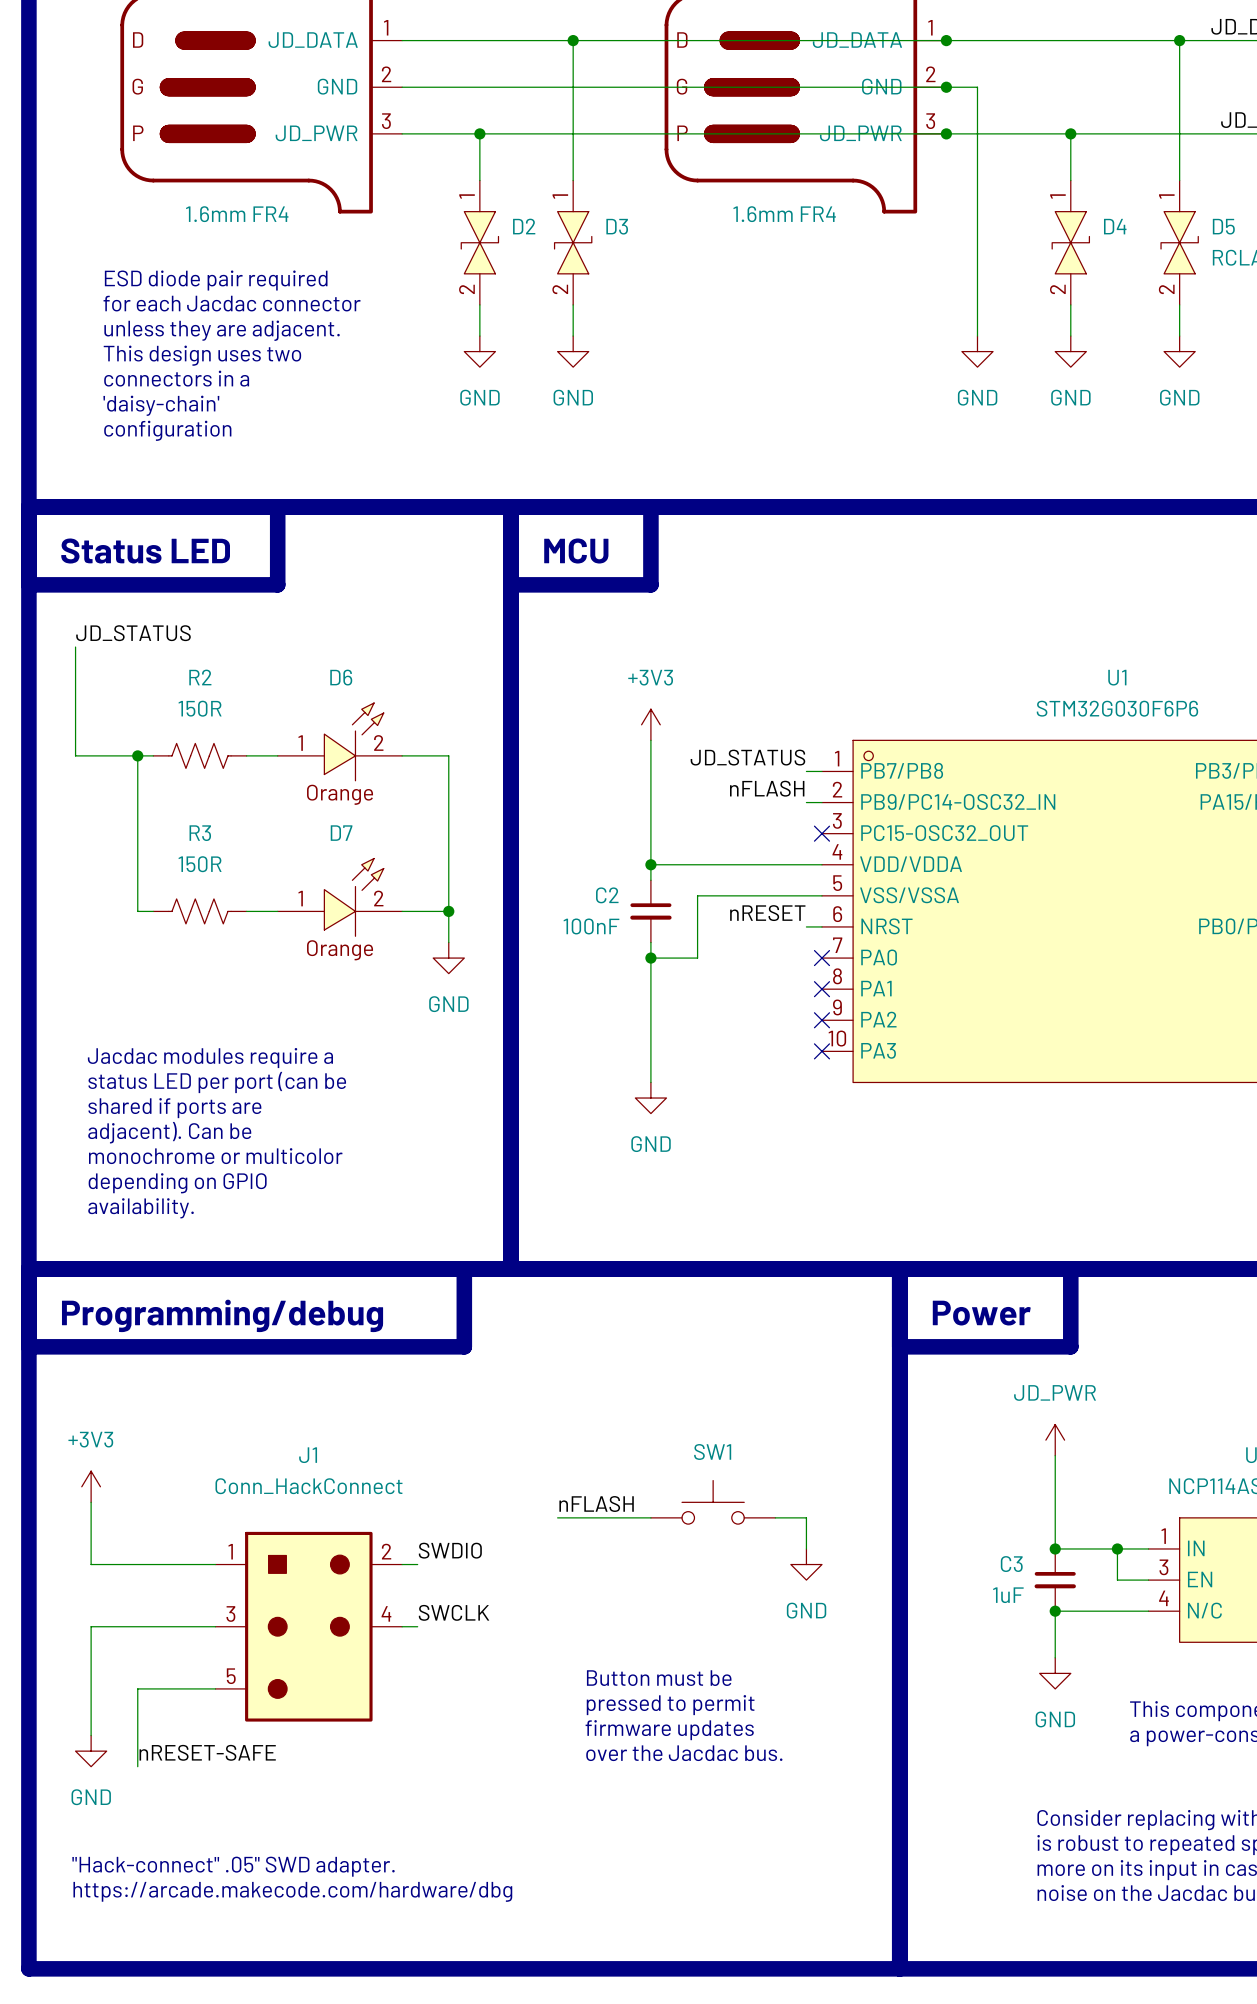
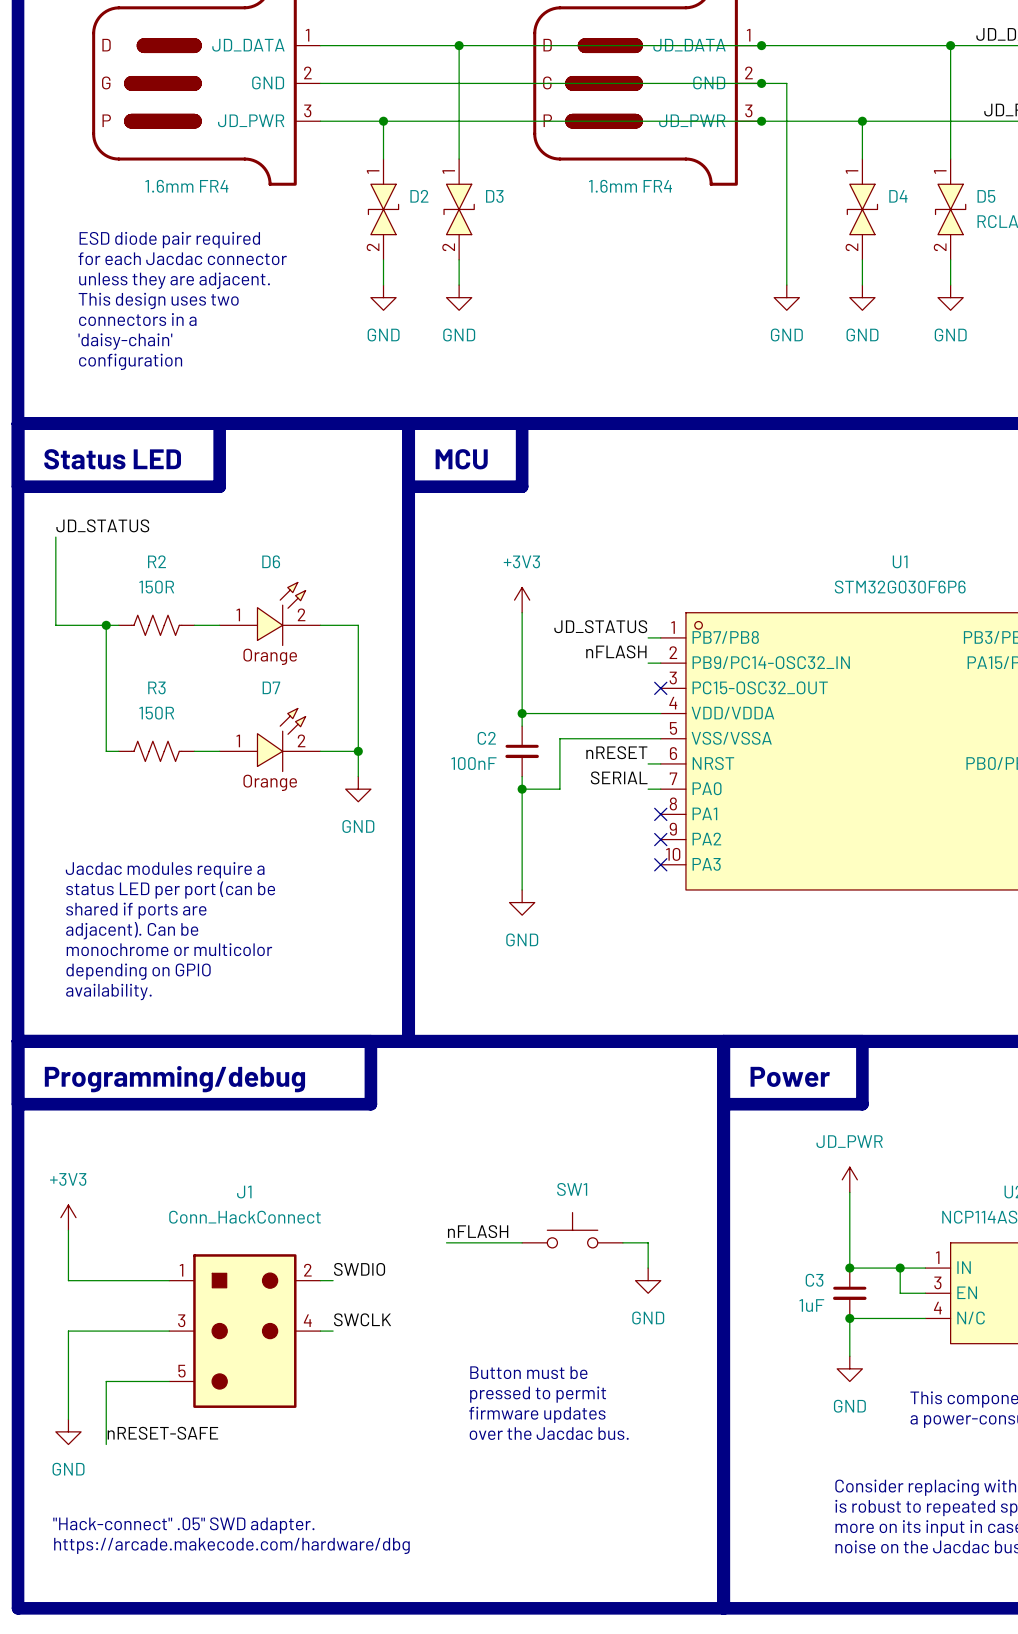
label: none -> SERIAL (619, 777)
wire: none -> (648, 789) (660, 789)
no-connect mark: (821, 958) -> none

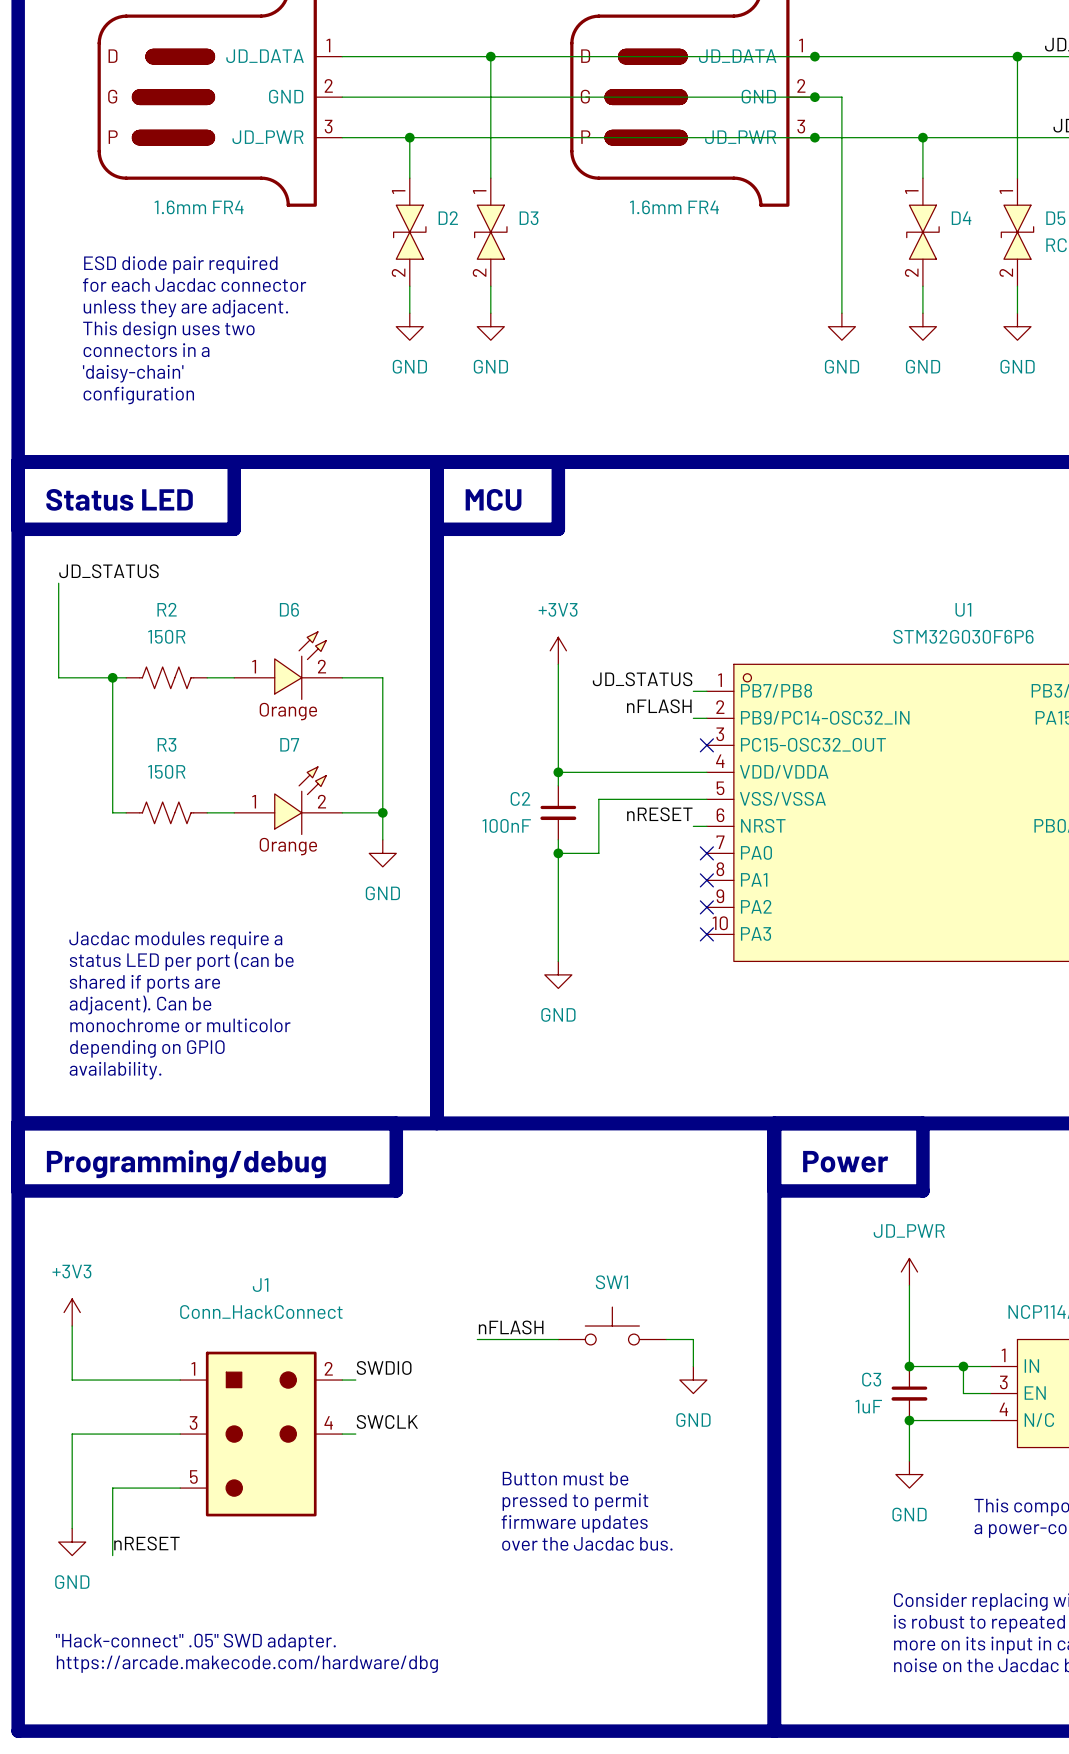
label: SERIAL (619, 777) -> none
wire: (648, 789) (660, 789) -> none
no-connect mark: none -> (706, 853)
label: nRESET-SAFE (162, 1433) -> nRESET (146, 1543)

